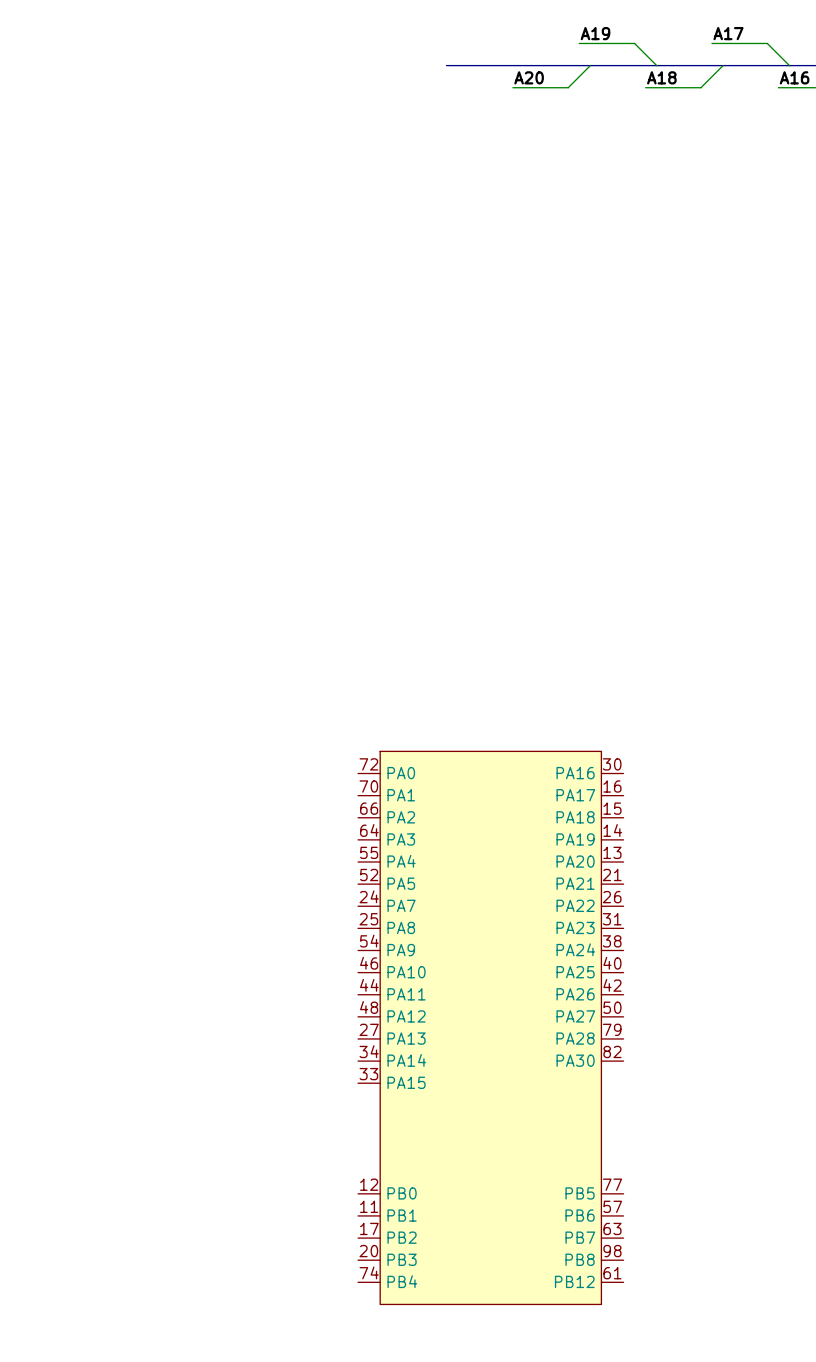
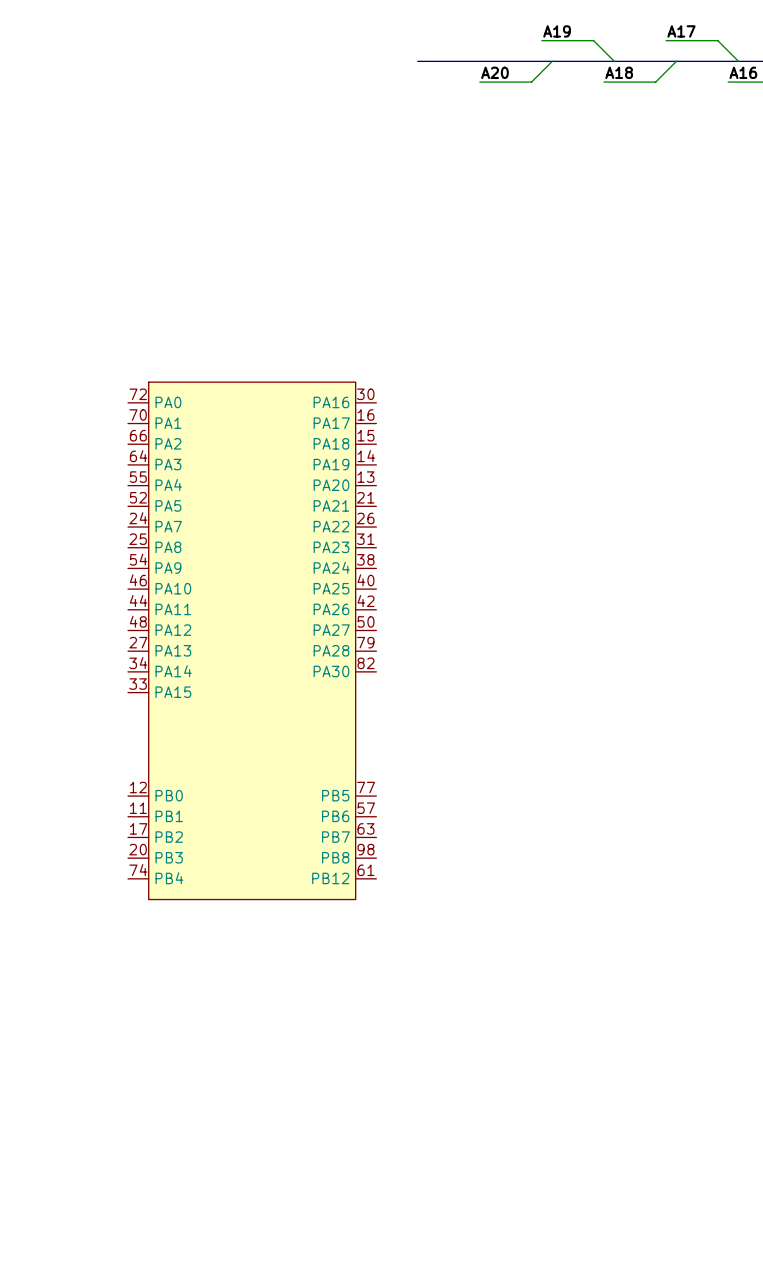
part: none -> (252, 640)
part: (490, 1027) -> none

